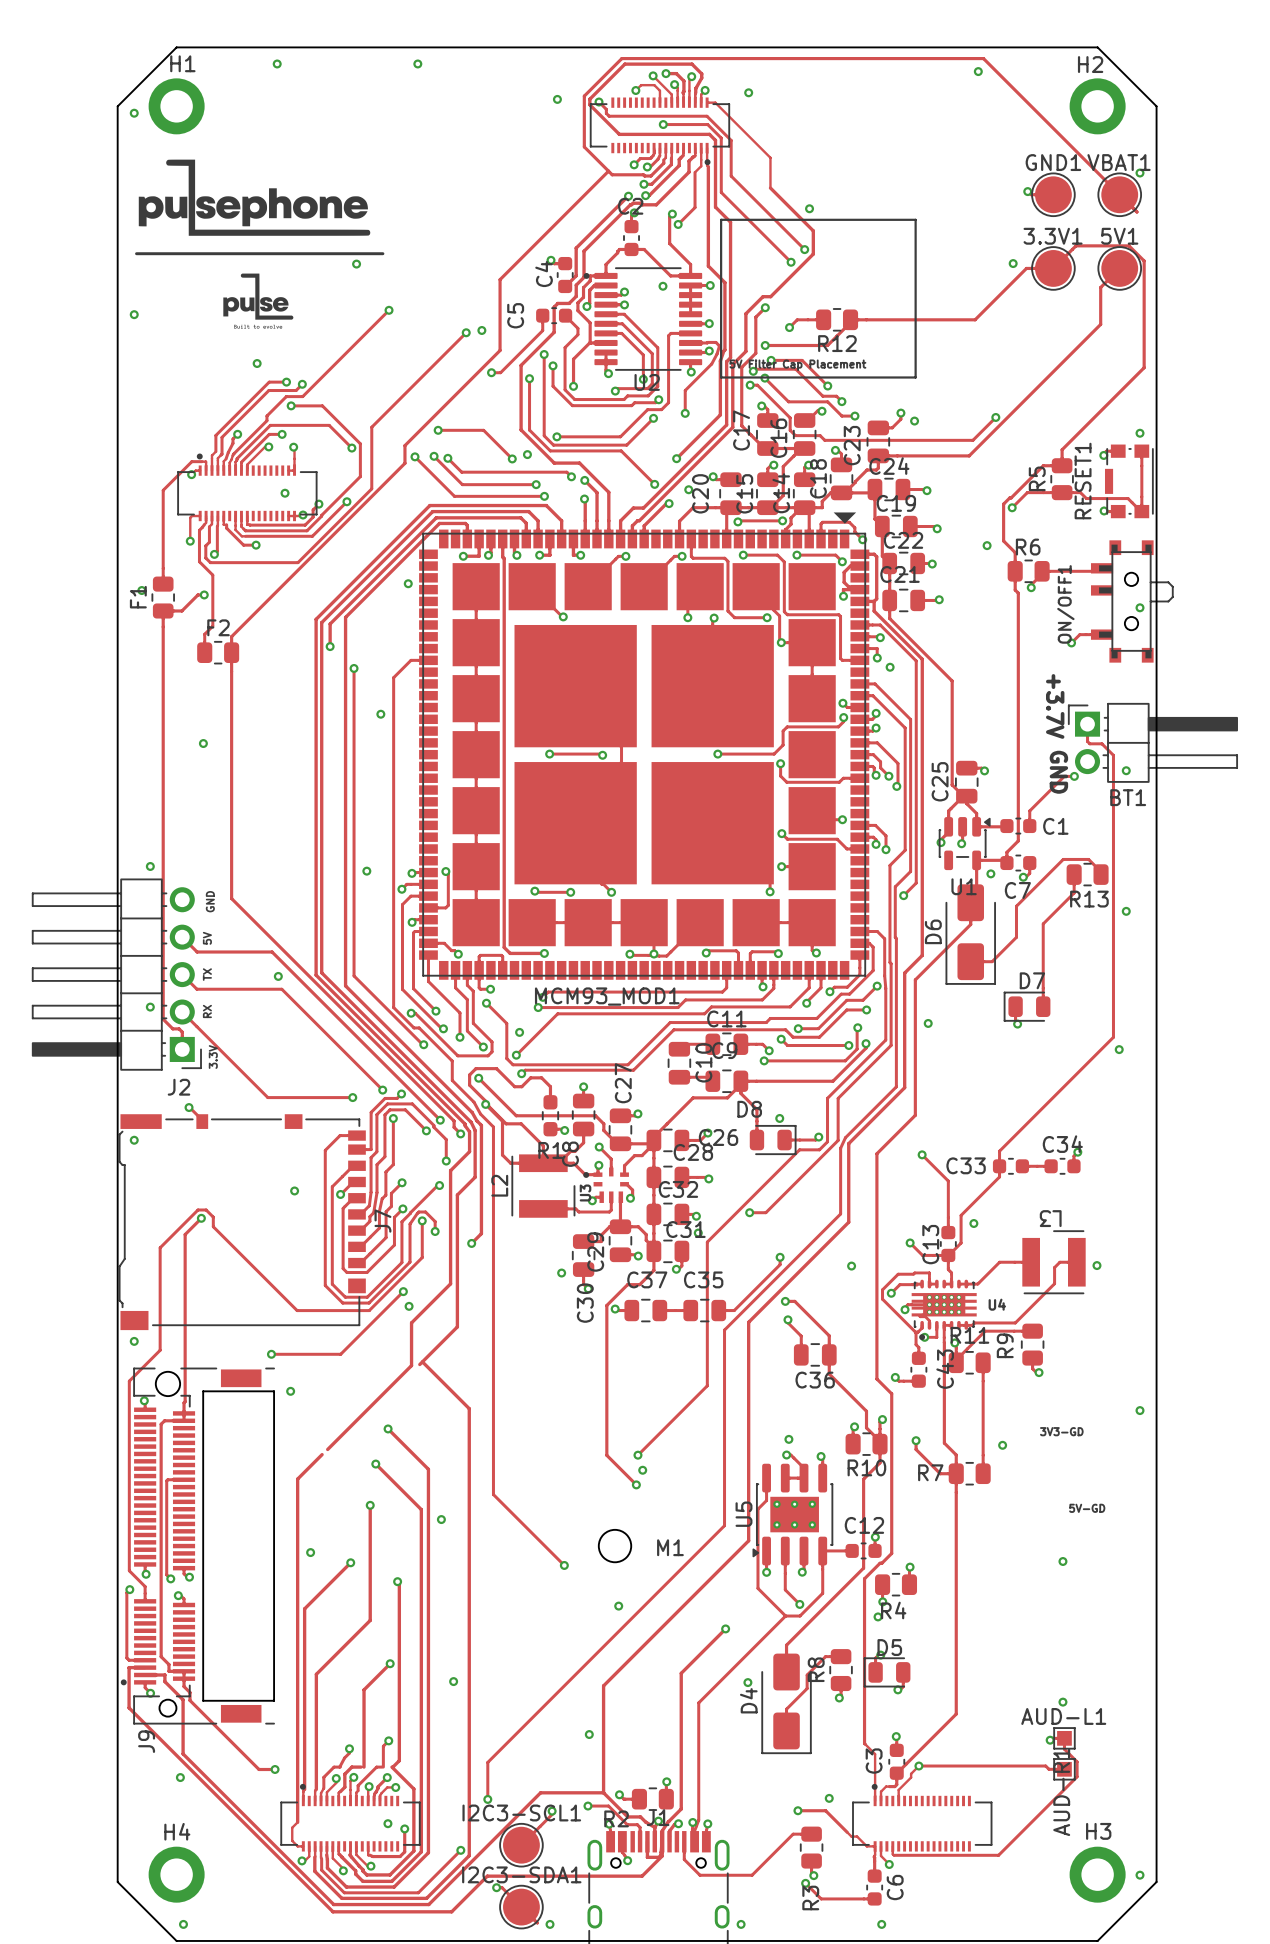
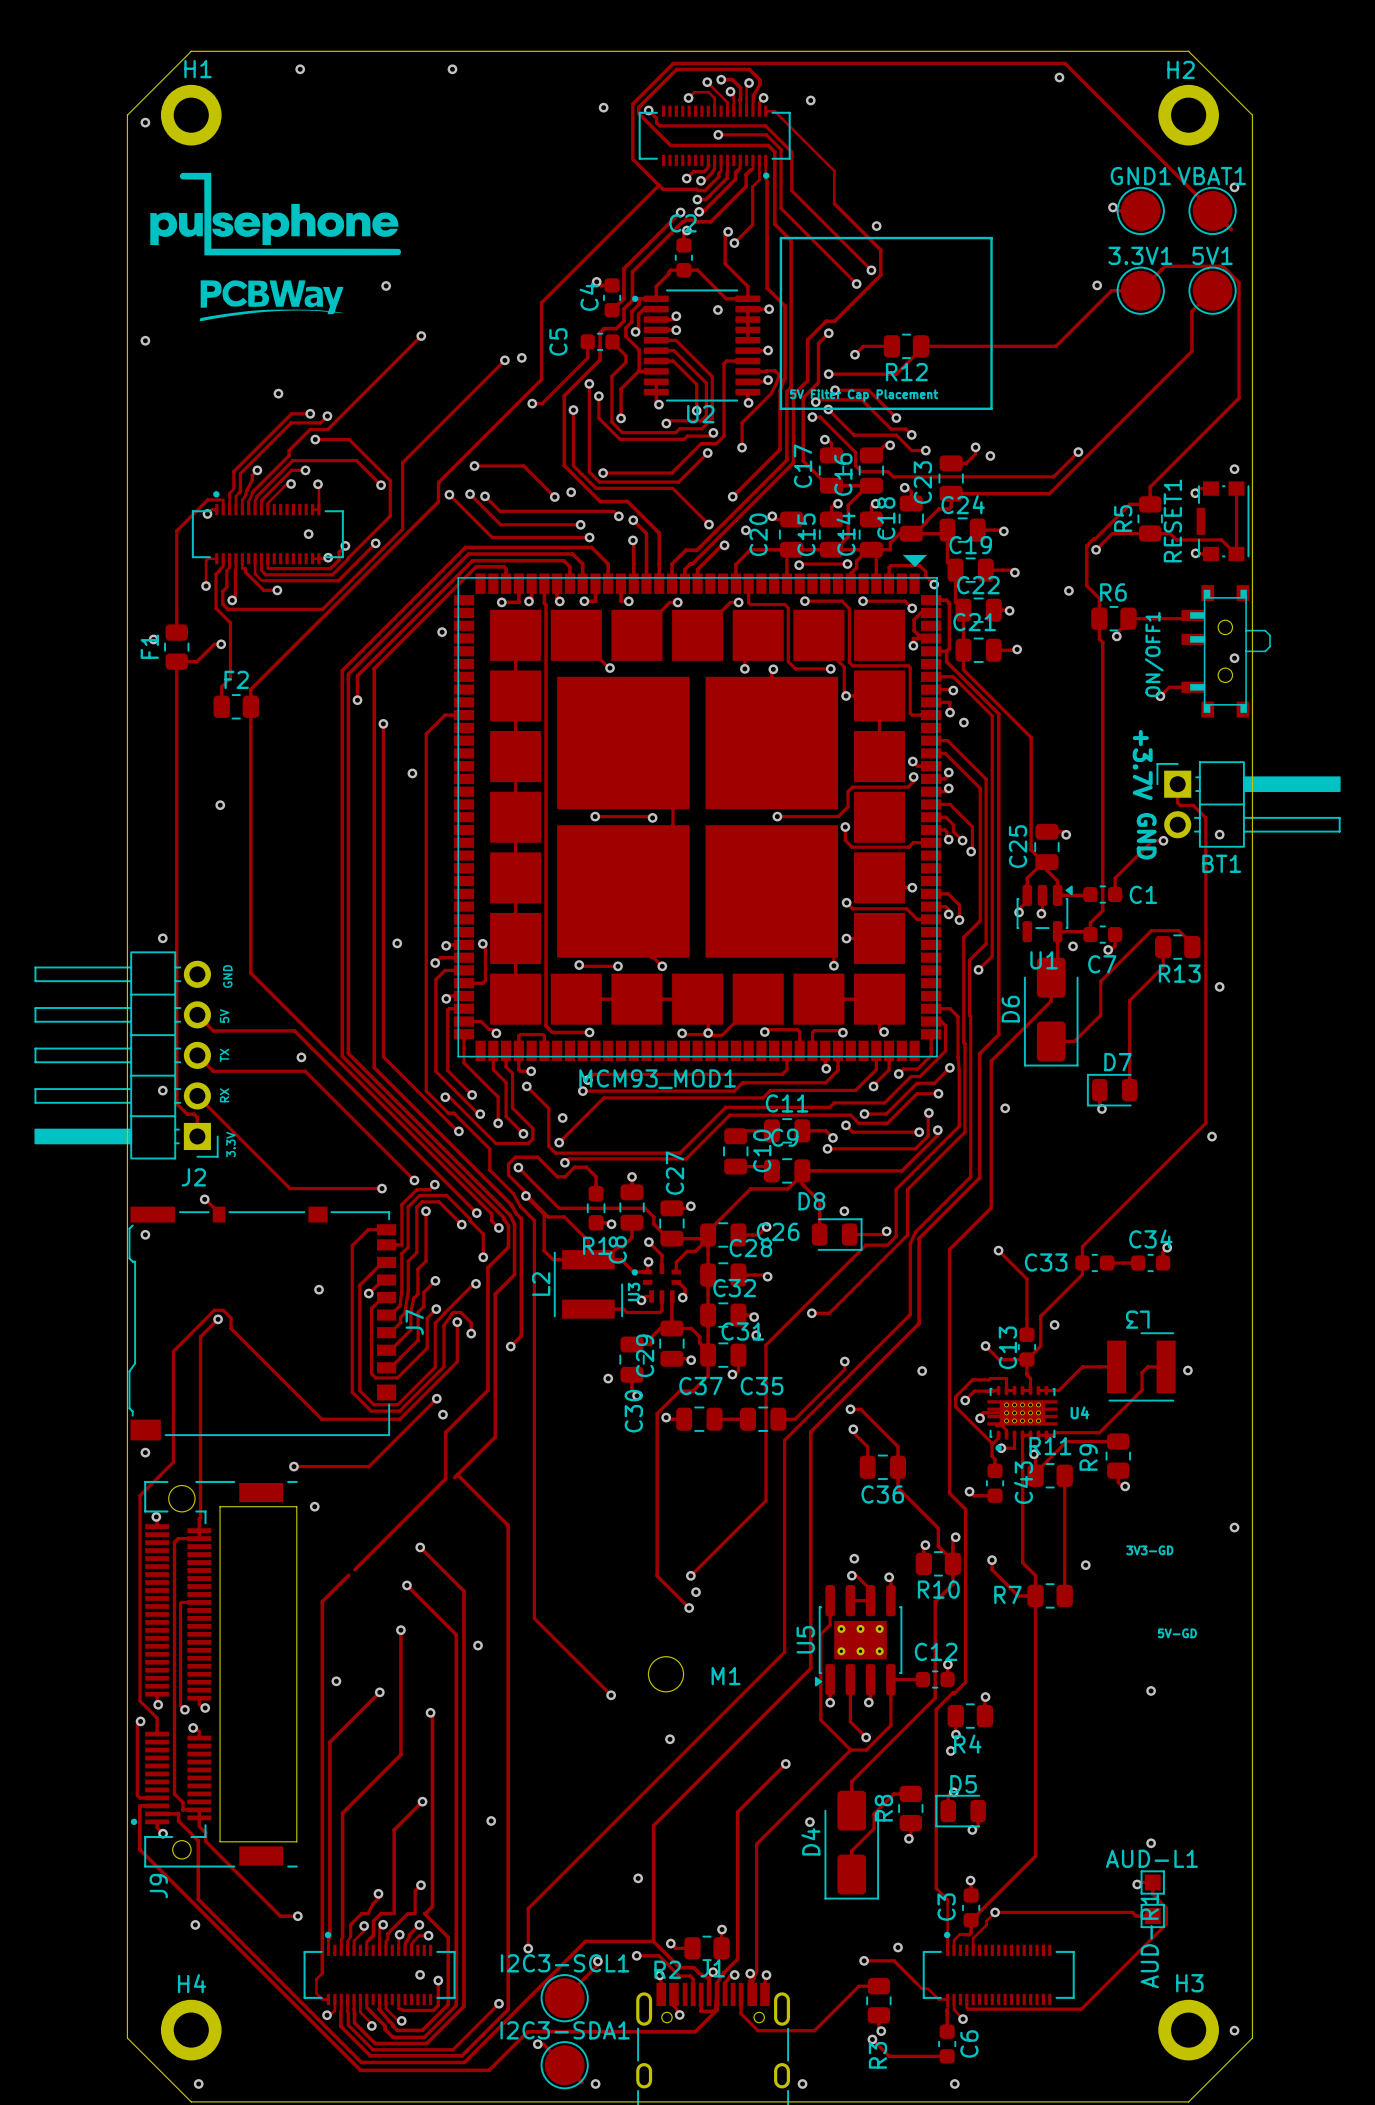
line: (136, 253) (382, 253) -> none
drawing: none -> [199, 280, 344, 322]
drawing: [223, 273, 294, 329] -> none

